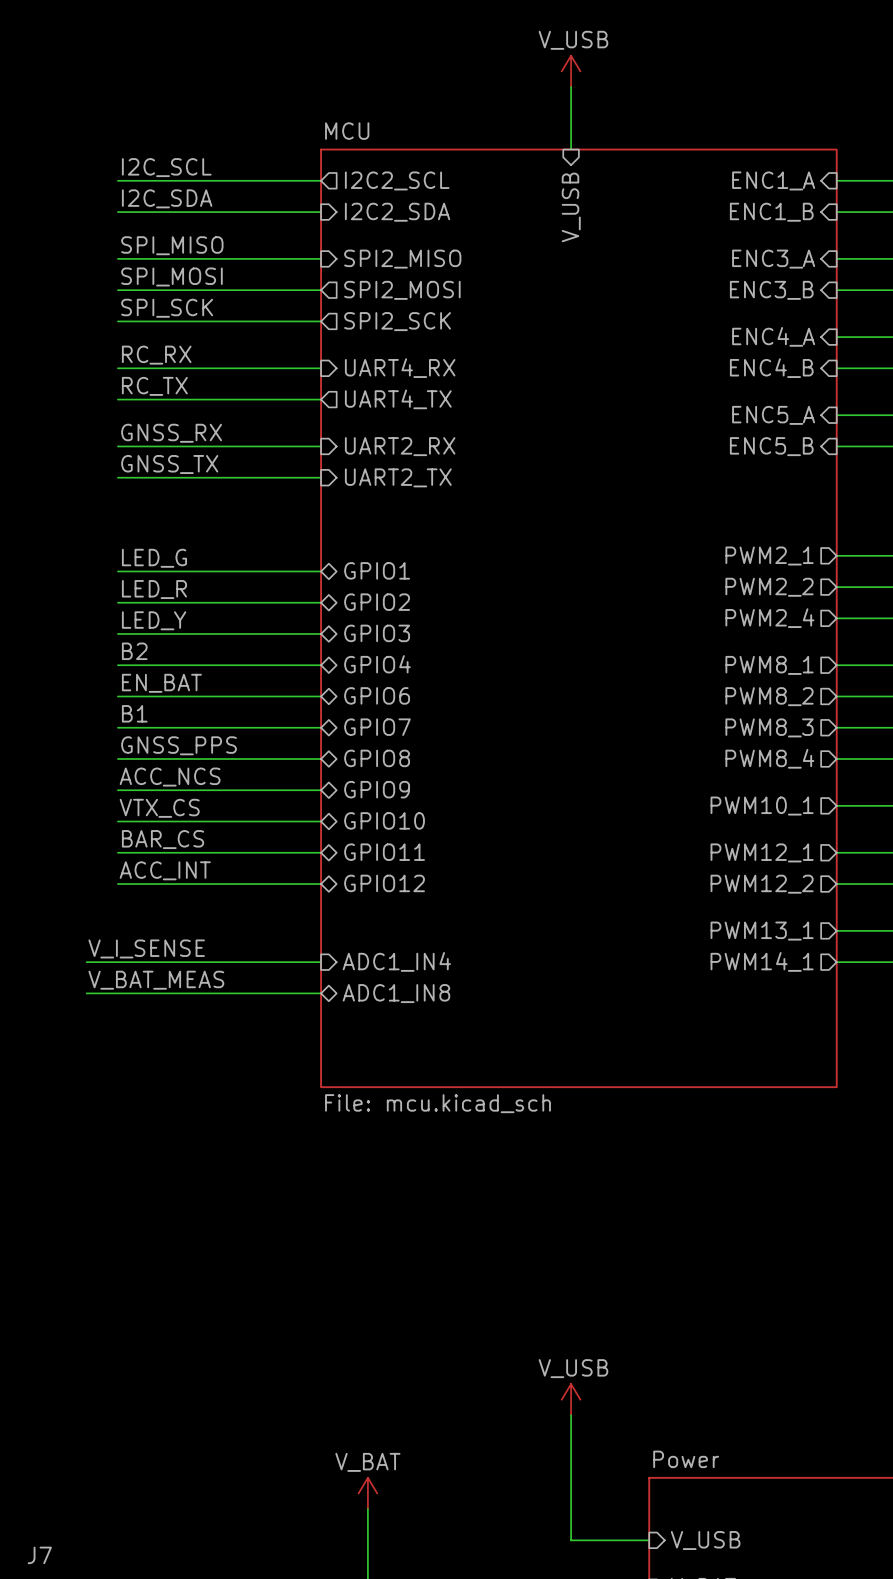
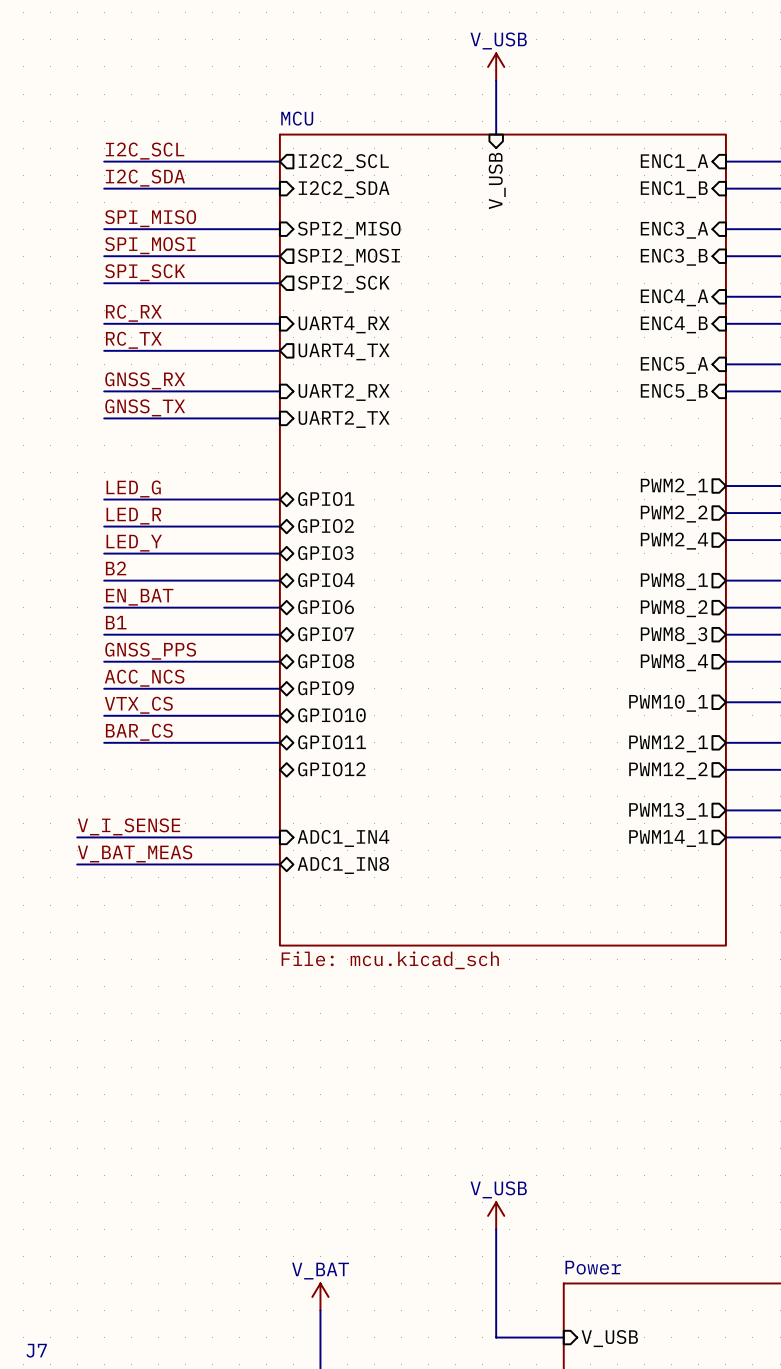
label: ACC_INT (165, 870) -> none
wire: (117, 884) (321, 884) -> none

